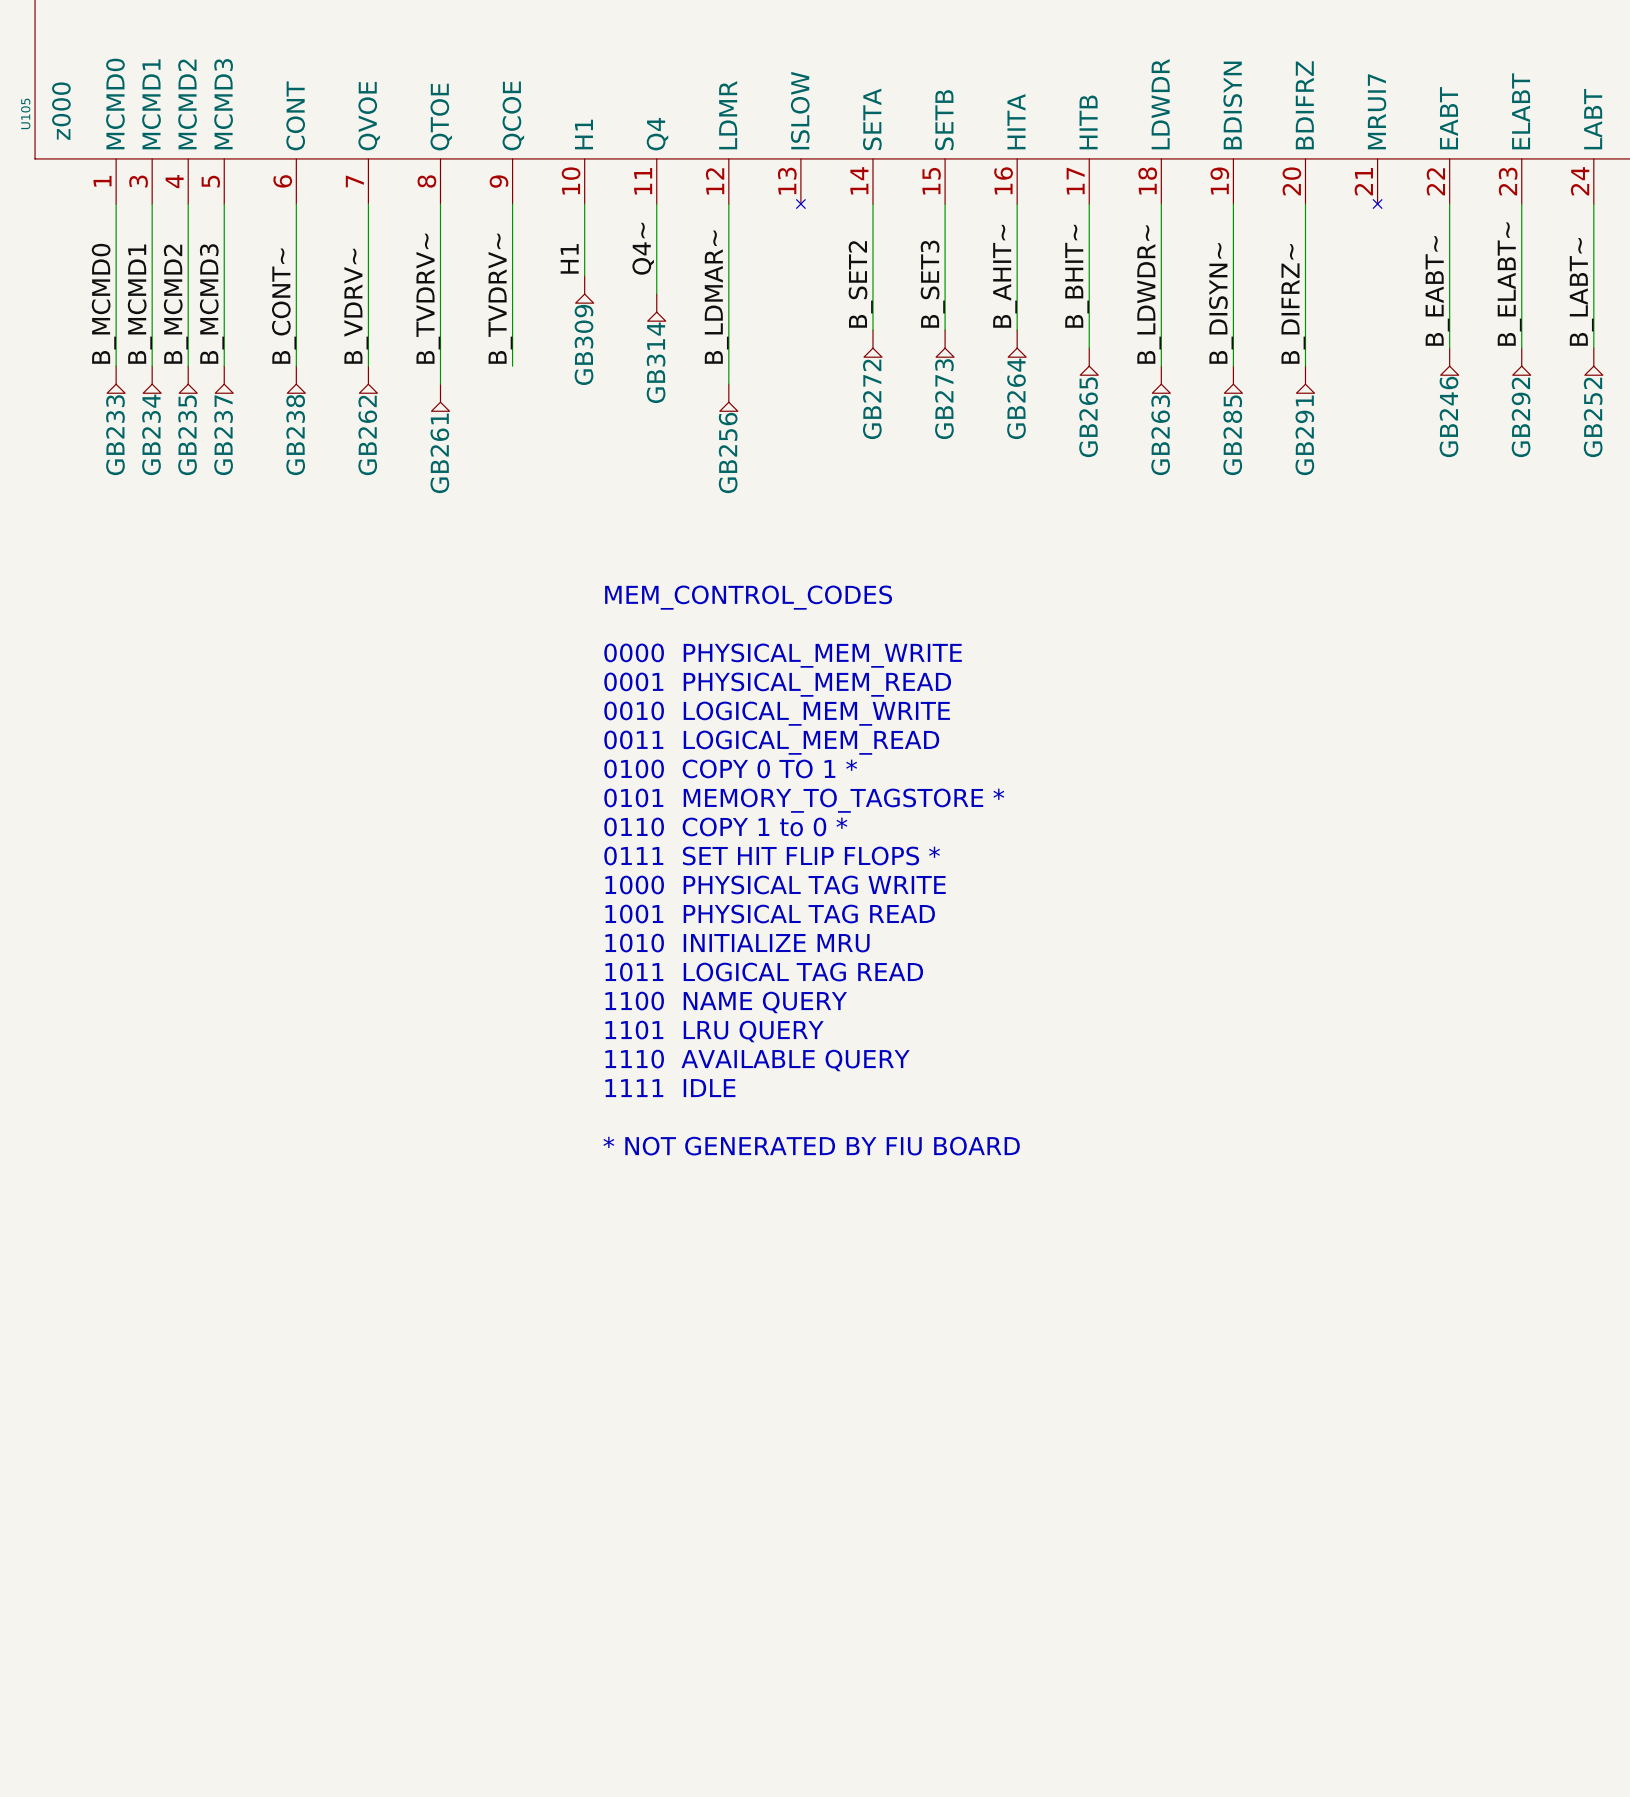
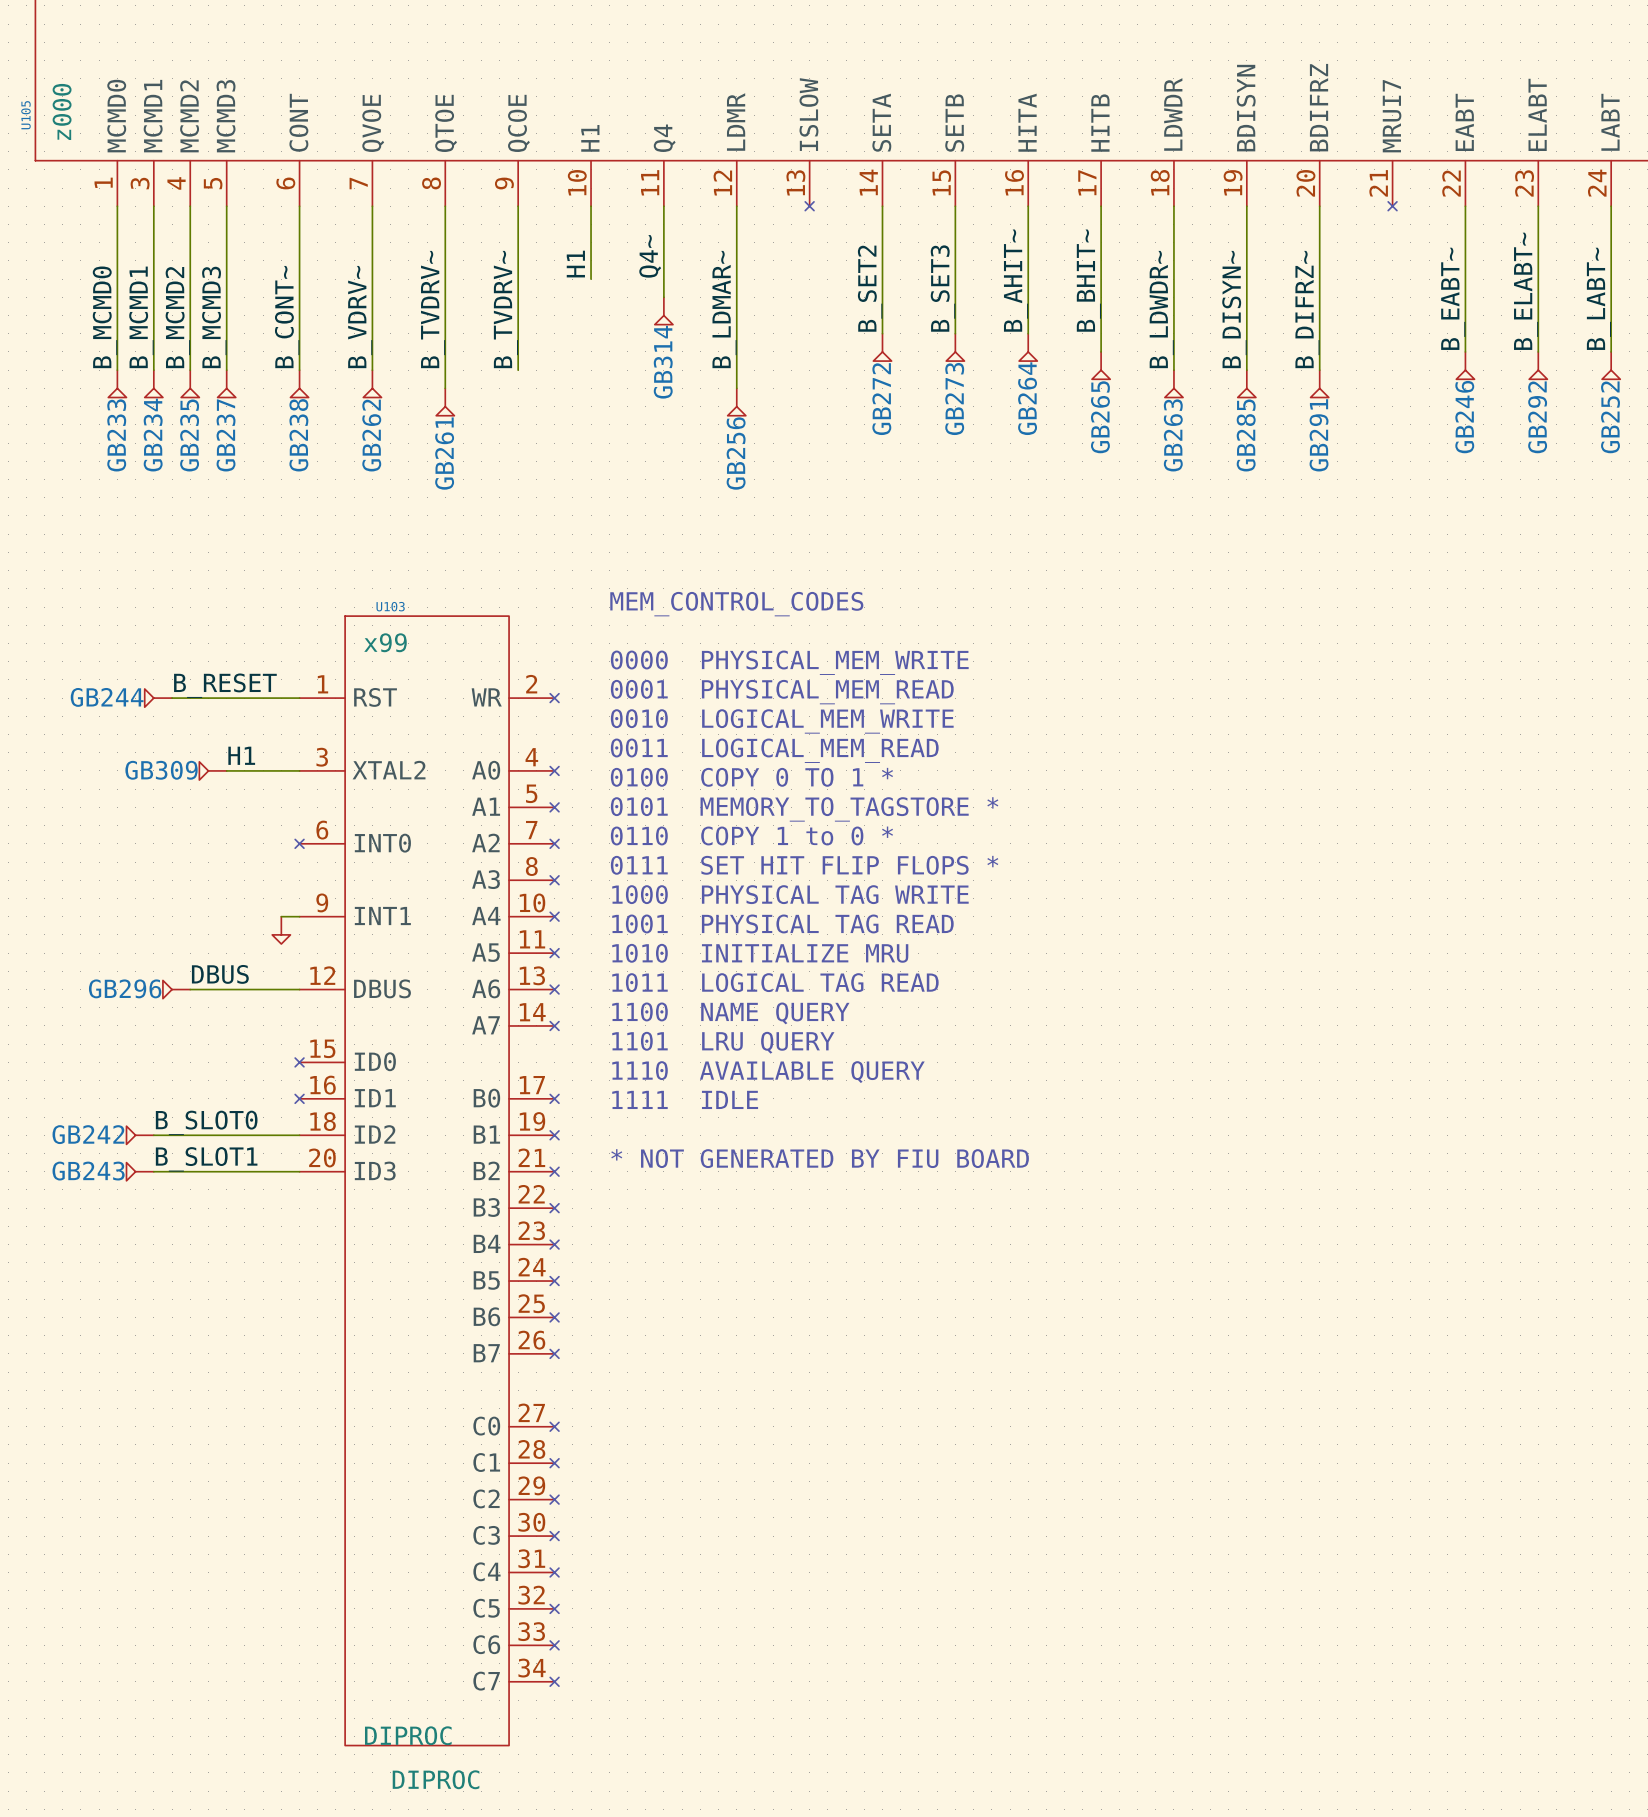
GB309 position: (584, 289) -> (212, 770)
GB309 rotation: 0° (584, 298) -> 90° clockwise (203, 770)
label: none -> B_RESET (225, 685)
GB244: none -> (158, 698)
wire: none -> (172, 698) (299, 698)
no-connect mark: none -> (554, 698)
label: none -> H1 (241, 755)
wire: none -> (226, 770) (299, 770)
no-connect mark: none -> (554, 770)
no-connect mark: none -> (554, 807)
no-connect mark: none -> (299, 843)
no-connect mark: none -> (554, 843)
no-connect mark: none -> (554, 880)
wire: none -> (281, 916) (299, 916)
no-connect mark: none -> (554, 916)
power symbol: none -> (281, 930)
no-connect mark: none -> (554, 953)
label: none -> DBUS (220, 974)
GB296: none -> (176, 989)
wire: none -> (190, 989) (299, 989)
no-connect mark: none -> (554, 989)
no-connect mark: none -> (554, 1025)
no-connect mark: none -> (299, 1062)
no-connect mark: none -> (299, 1098)
no-connect mark: none -> (554, 1098)
label: none -> B_SLOT0 (206, 1122)
GB242: none -> (139, 1135)
wire: none -> (153, 1135) (299, 1135)
no-connect mark: none -> (554, 1135)
label: none -> B_SLOT1 (206, 1159)
GB243: none -> (139, 1171)
wire: none -> (153, 1171) (299, 1171)
no-connect mark: none -> (554, 1171)
U103: none -> DIPROC (427, 1180)
no-connect mark: none -> (554, 1208)
no-connect mark: none -> (554, 1244)
no-connect mark: none -> (554, 1281)
no-connect mark: none -> (554, 1317)
no-connect mark: none -> (554, 1353)
no-connect mark: none -> (554, 1426)
no-connect mark: none -> (554, 1463)
no-connect mark: none -> (554, 1499)
no-connect mark: none -> (554, 1536)
no-connect mark: none -> (554, 1572)
no-connect mark: none -> (554, 1608)
no-connect mark: none -> (554, 1645)
no-connect mark: none -> (554, 1681)

